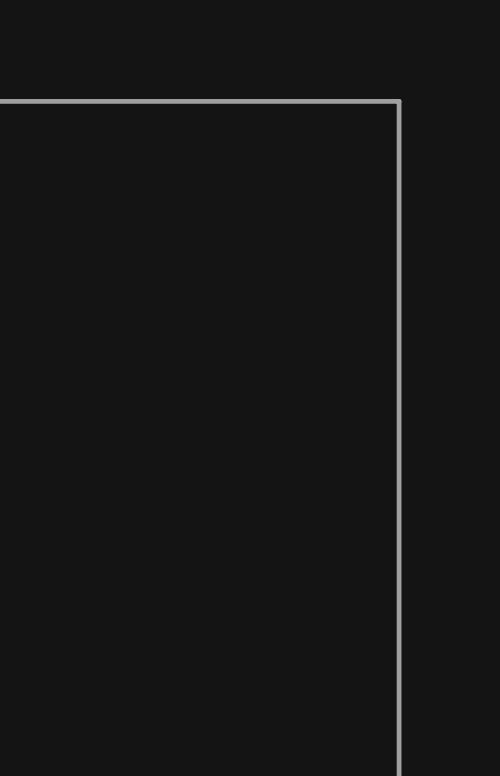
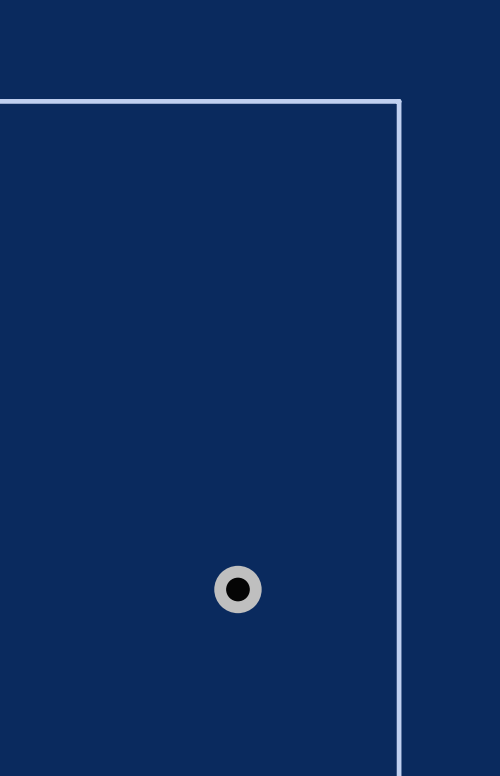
via: none -> (237, 589)

